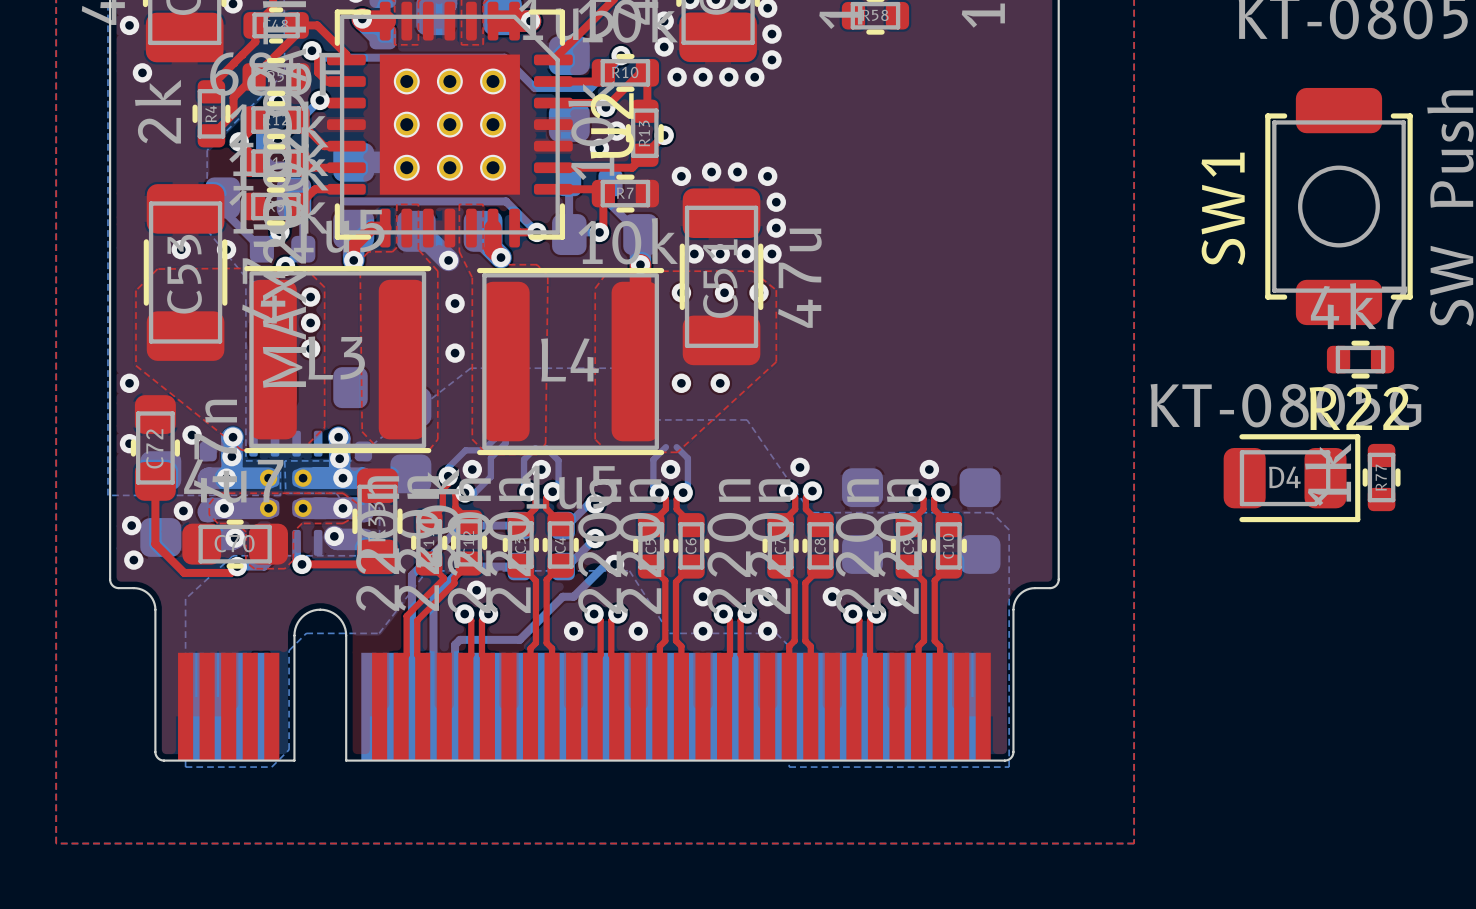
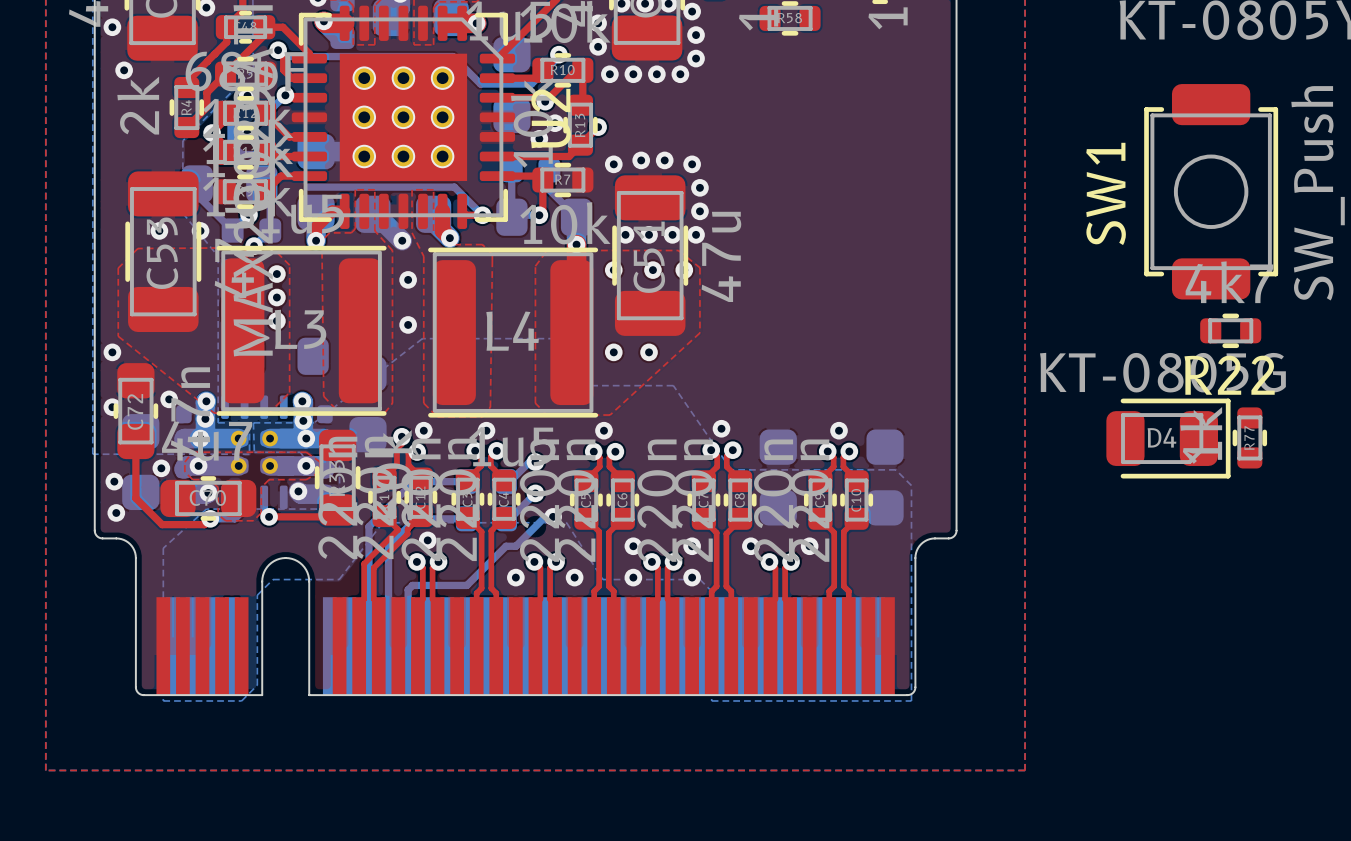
bottom track: (494, 428) (494, 438) (483, 450) (465, 450) (448, 467) (448, 476) -> none
bottom track: (505, 428) (505, 443) (490, 457) (490, 476) (474, 492) (465, 492) -> none
bottom track: (665, 447) (653, 459) (653, 486) (659, 492) -> none
bottom track: (676, 447) (687, 458) (687, 487) (683, 492) -> none
bottom track: (535, 448) (524, 459) (524, 486) (528, 491) -> none
bottom track: (546, 448) (558, 460) (558, 485) (552, 491) -> none

